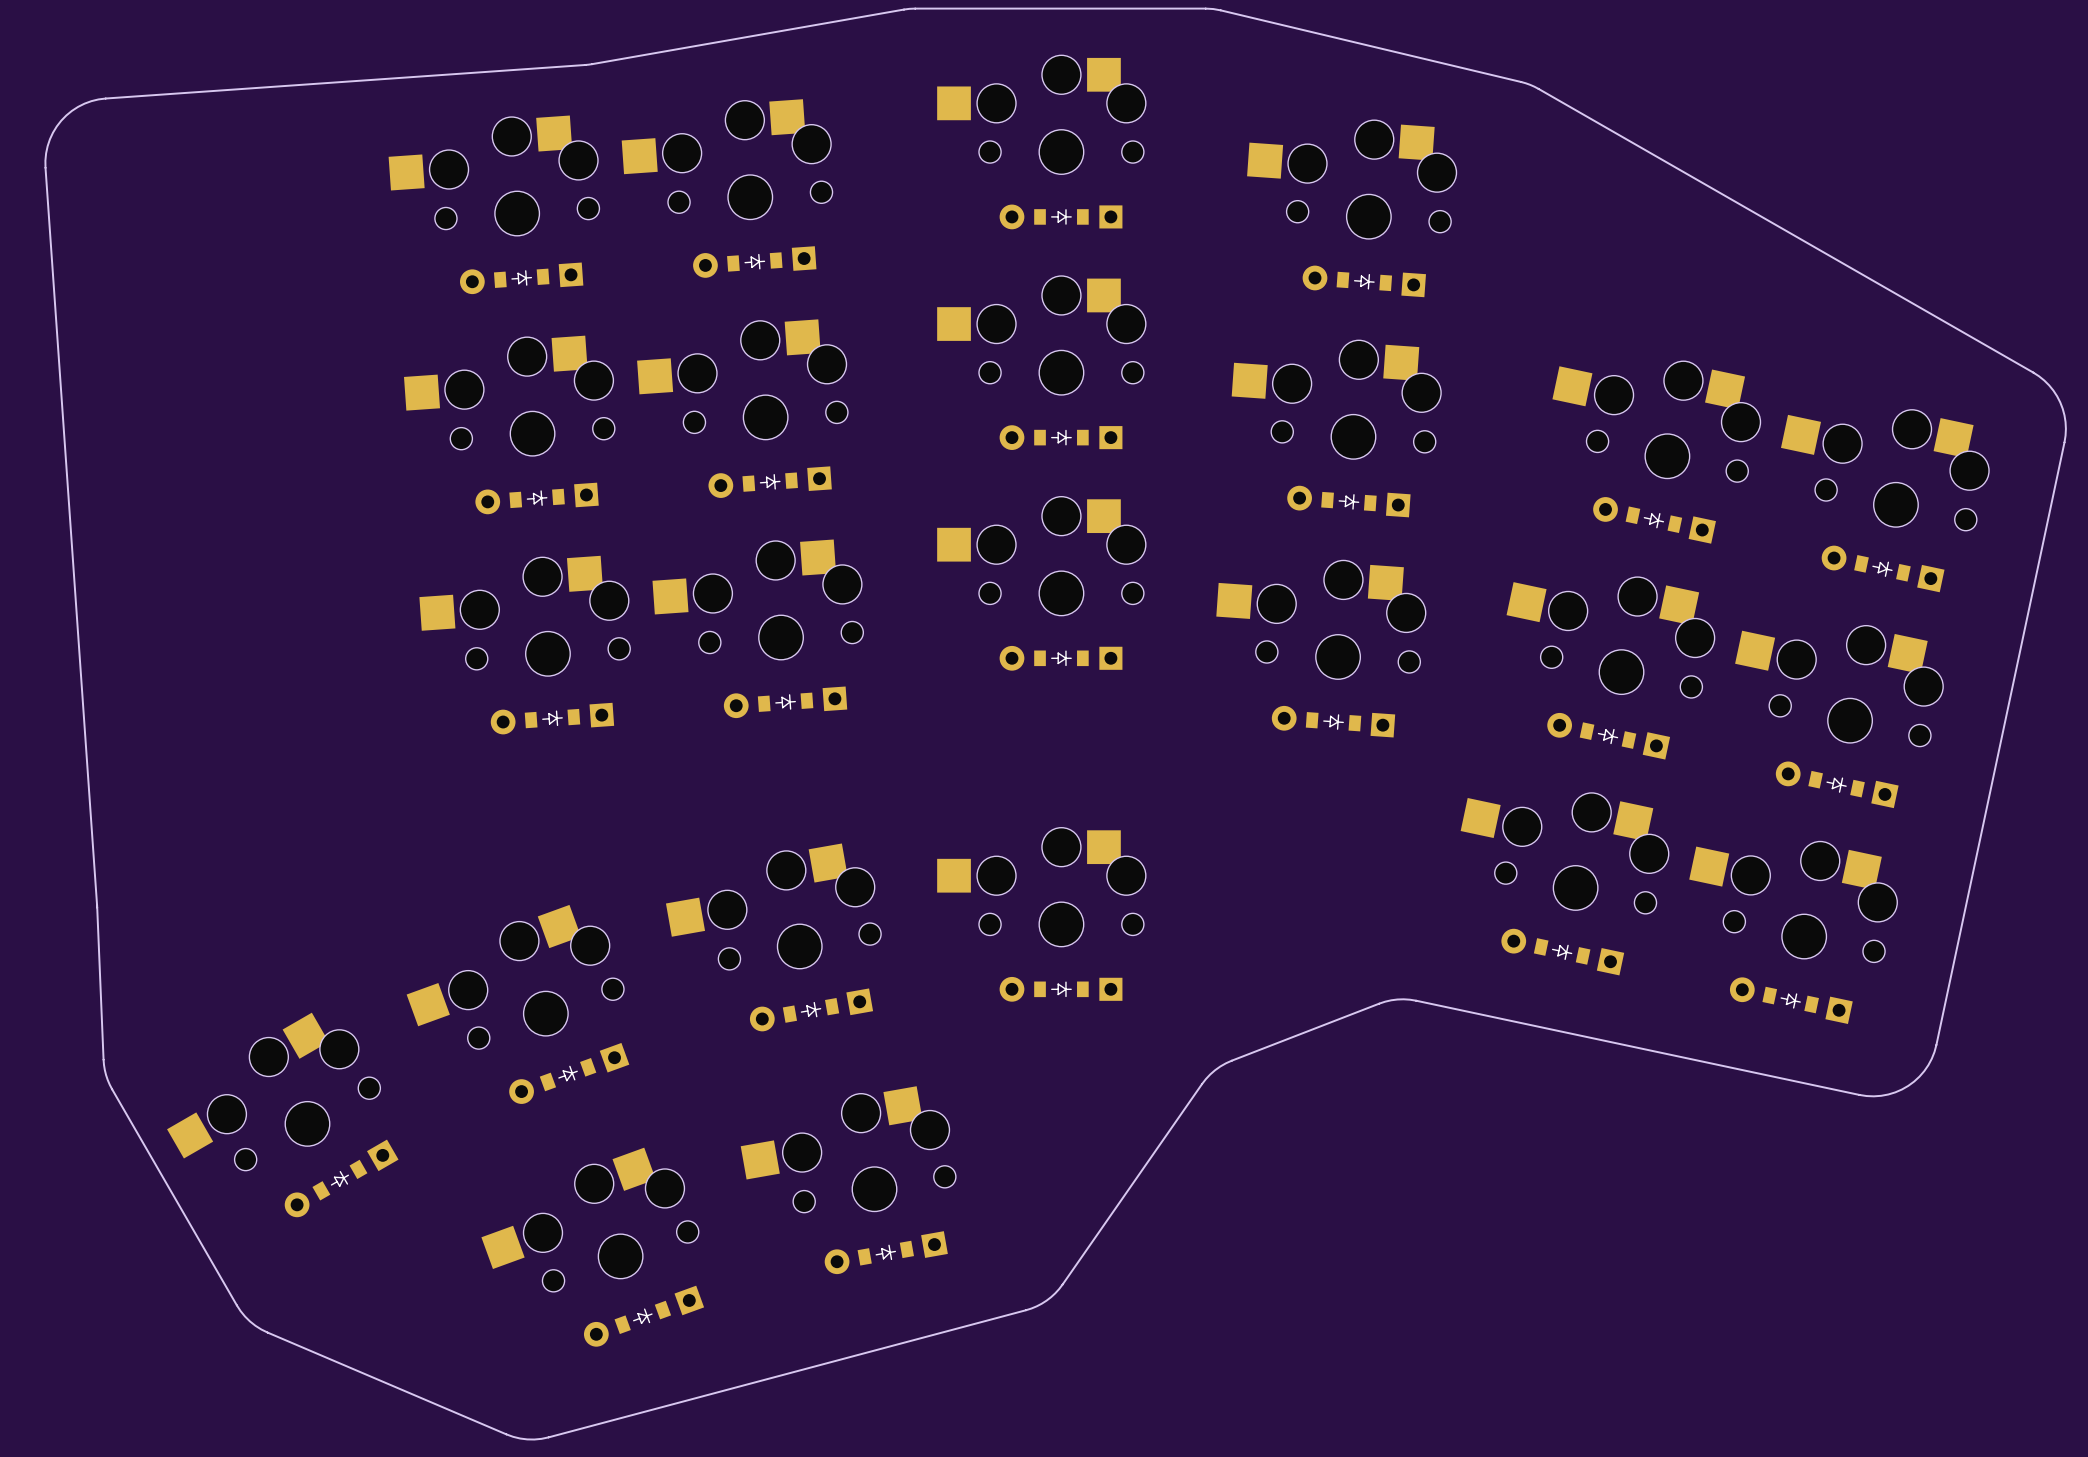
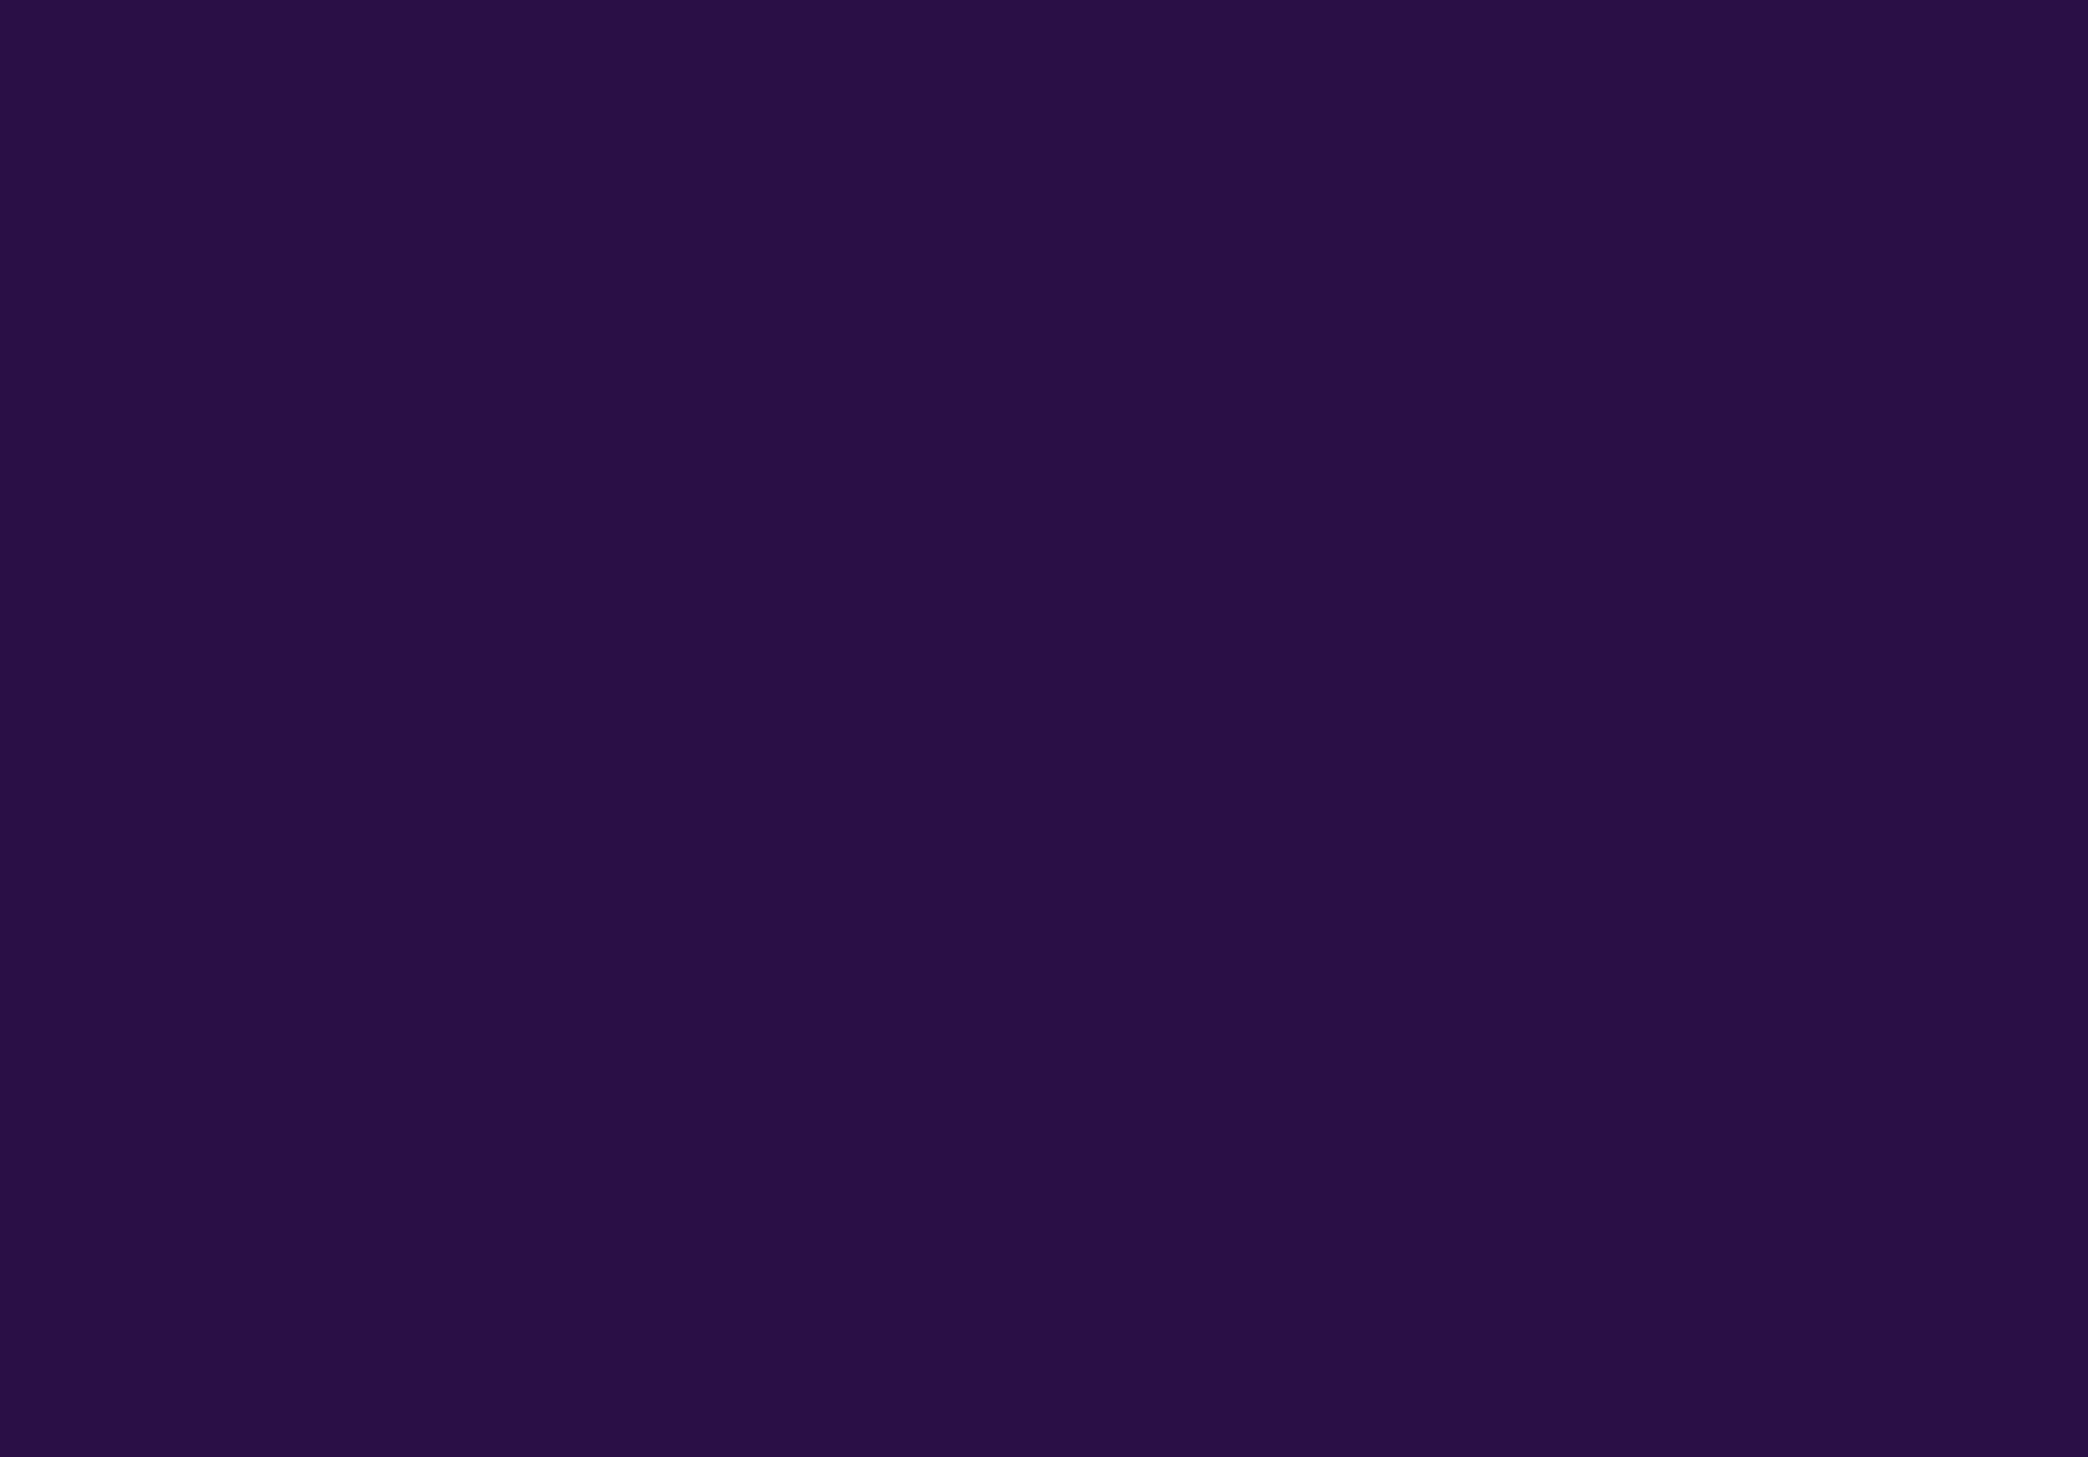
board edge: (1205, 8) (909, 8) (588, 64) (98, 99) (84, 103) (71, 110) (56, 126) (47, 146) (45, 167) (97, 905) (104, 1070) (112, 1089) (236, 1305) (255, 1325) (506, 1434) (520, 1438) (541, 1438) (1036, 1306) (1051, 1297) (1062, 1284) (1210, 1074) (1231, 1060) (1385, 1001) (1397, 999) (1416, 1000) (1866, 1096) (1881, 1095) (1901, 1089) (1914, 1081) (1924, 1071) (1931, 1058) (1936, 1044) (2064, 442) (2064, 415) (2053, 390) (2033, 372) (1534, 86) (1220, 10) (1205, 8) -> none
part: (1041, 114) -> none
part: (727, 159) -> none
part: (494, 175) -> none
part: (1351, 179) -> none
part: (1061, 216) -> none
part: (754, 262) -> none
part: (521, 278) -> none
part: (1364, 281) -> none
part: (1041, 335) -> none
part: (742, 379) -> none
part: (509, 395) -> none
part: (1336, 399) -> none
part: (1656, 421) -> none
part: (1061, 437) -> none
part: (1885, 470) -> none
part: (770, 482) -> none
part: (537, 498) -> none
part: (1348, 501) -> none
part: (1654, 520) -> none
part: (1041, 556) -> none
part: (1883, 568) -> none
part: (757, 599) -> none
part: (524, 615) -> none
part: (1320, 619) -> none
part: (1610, 637) -> none
part: (1061, 658) -> none
part: (1839, 686) -> none
part: (785, 702) -> none
part: (552, 718) -> none
part: (1333, 721) -> none
part: (1608, 736) -> none
part: (1837, 784) -> none
part: (1564, 853) -> none
part: (1041, 887) -> none
part: (1793, 901) -> none
part: (773, 906) -> none
part: (1562, 952) -> none
part: (515, 977) -> none
part: (1061, 989) -> none
part: (1791, 1000) -> none
part: (811, 1009) -> none
part: (569, 1073) -> none
part: (273, 1091) -> none
part: (848, 1149) -> none
part: (341, 1178) -> none
part: (590, 1219) -> none
part: (886, 1252) -> none
part: (644, 1316) -> none

